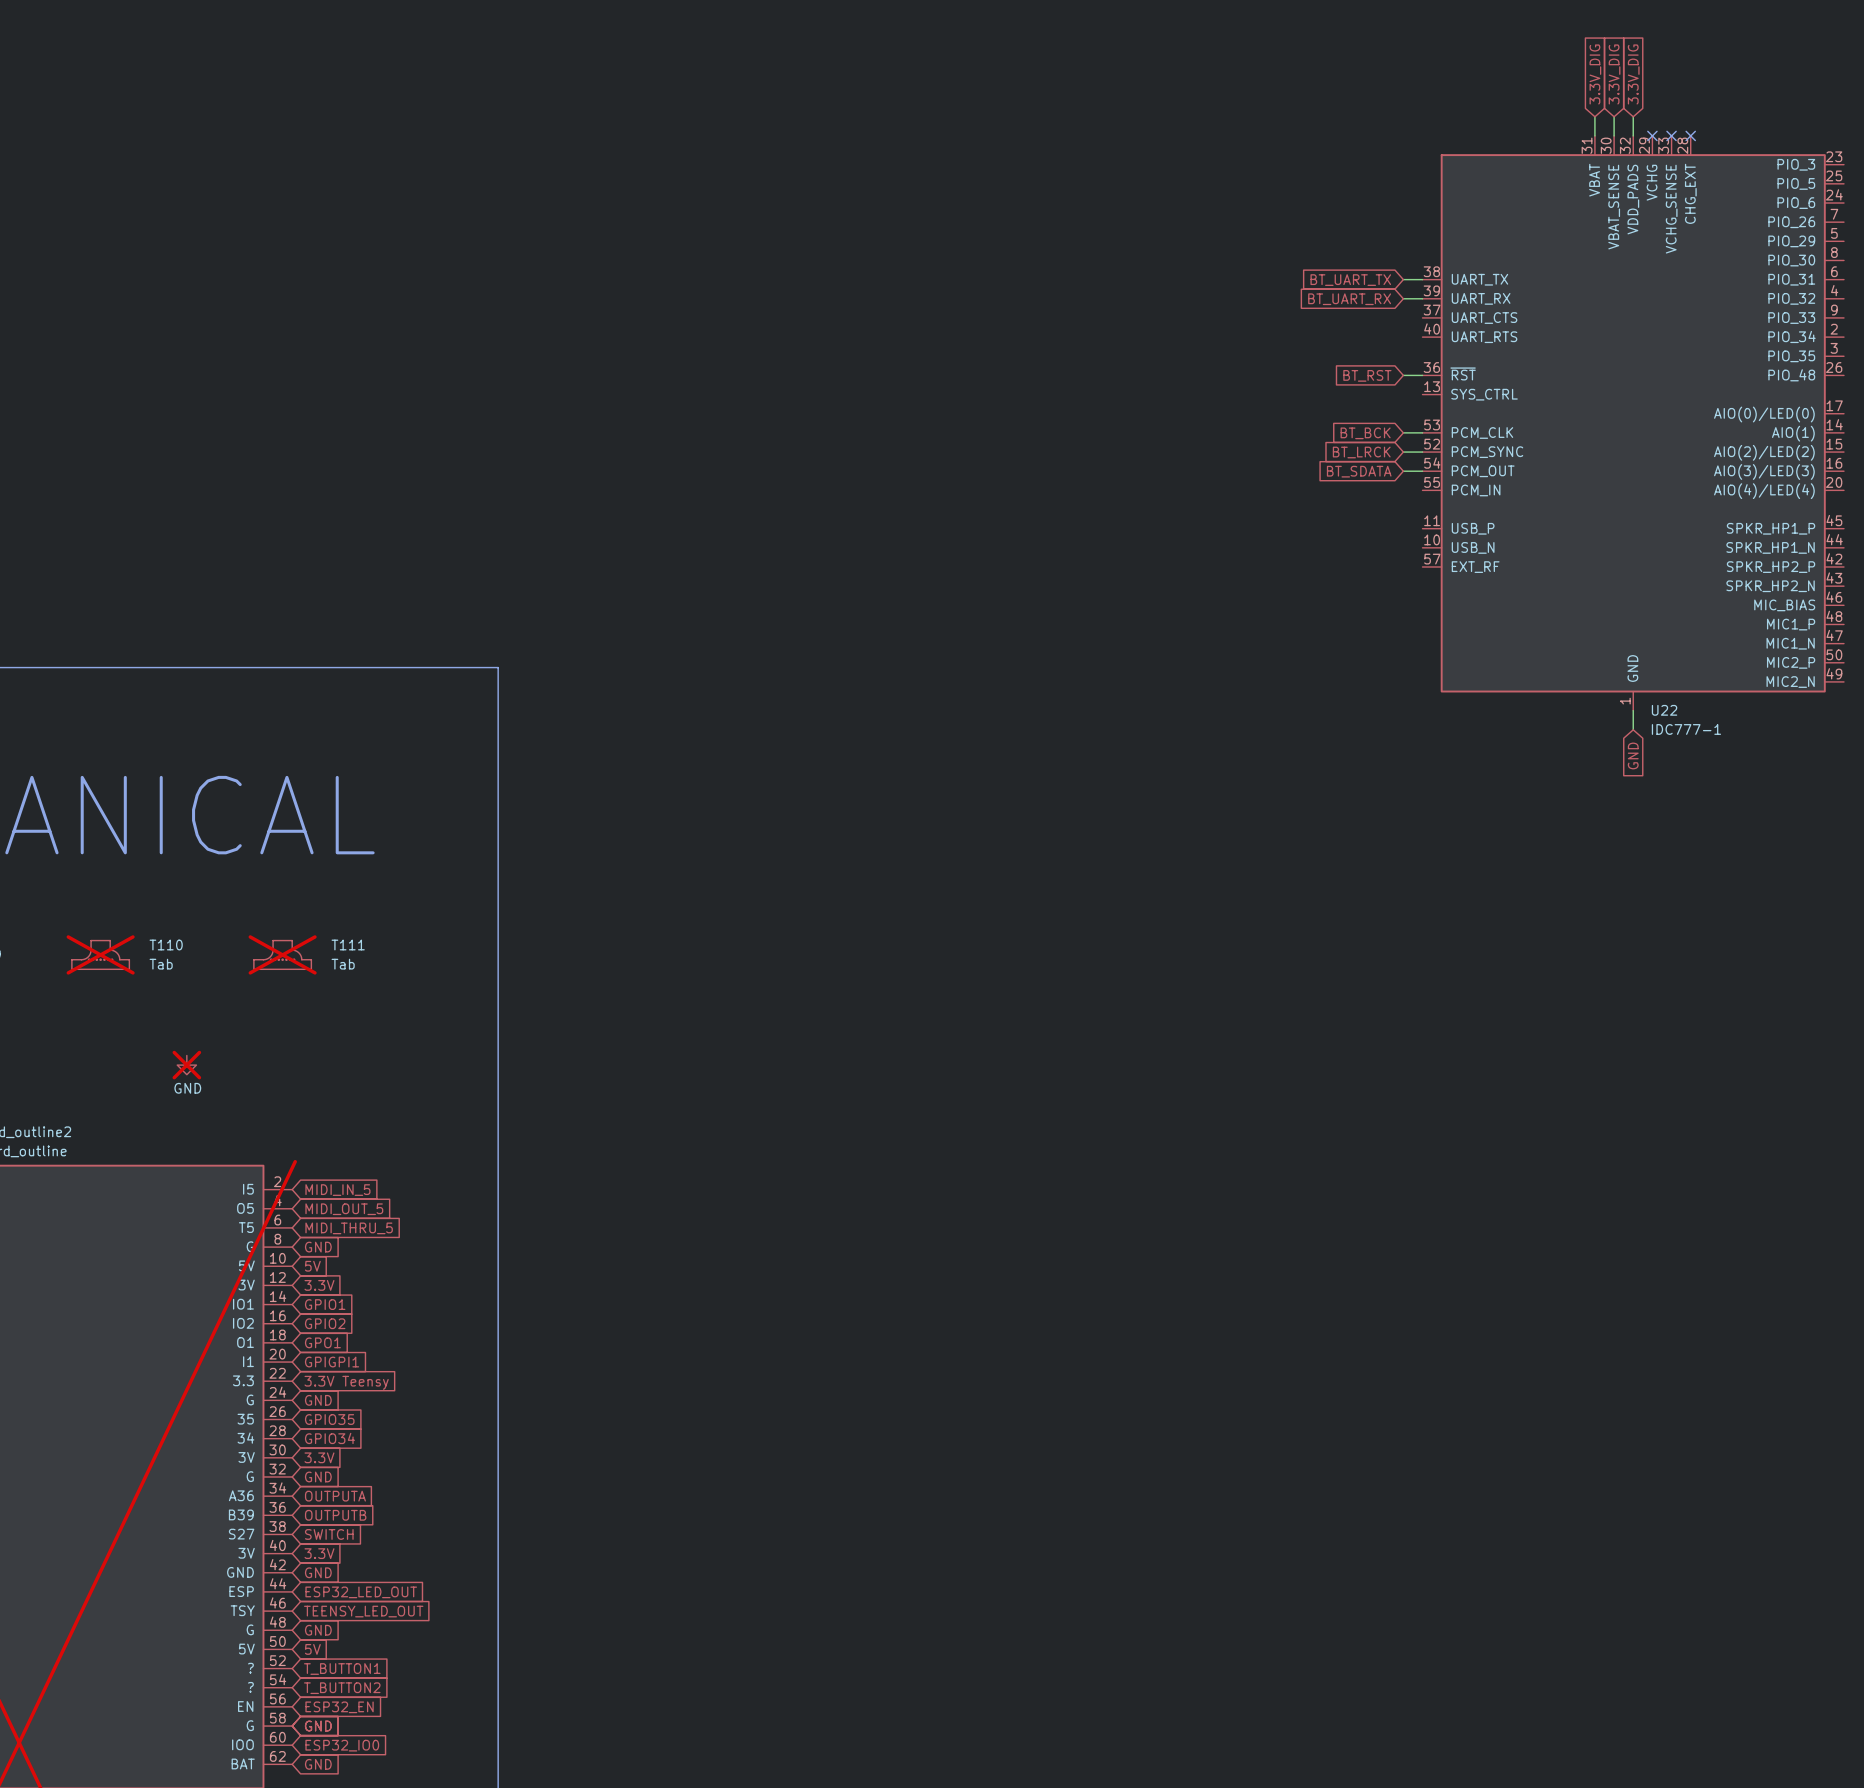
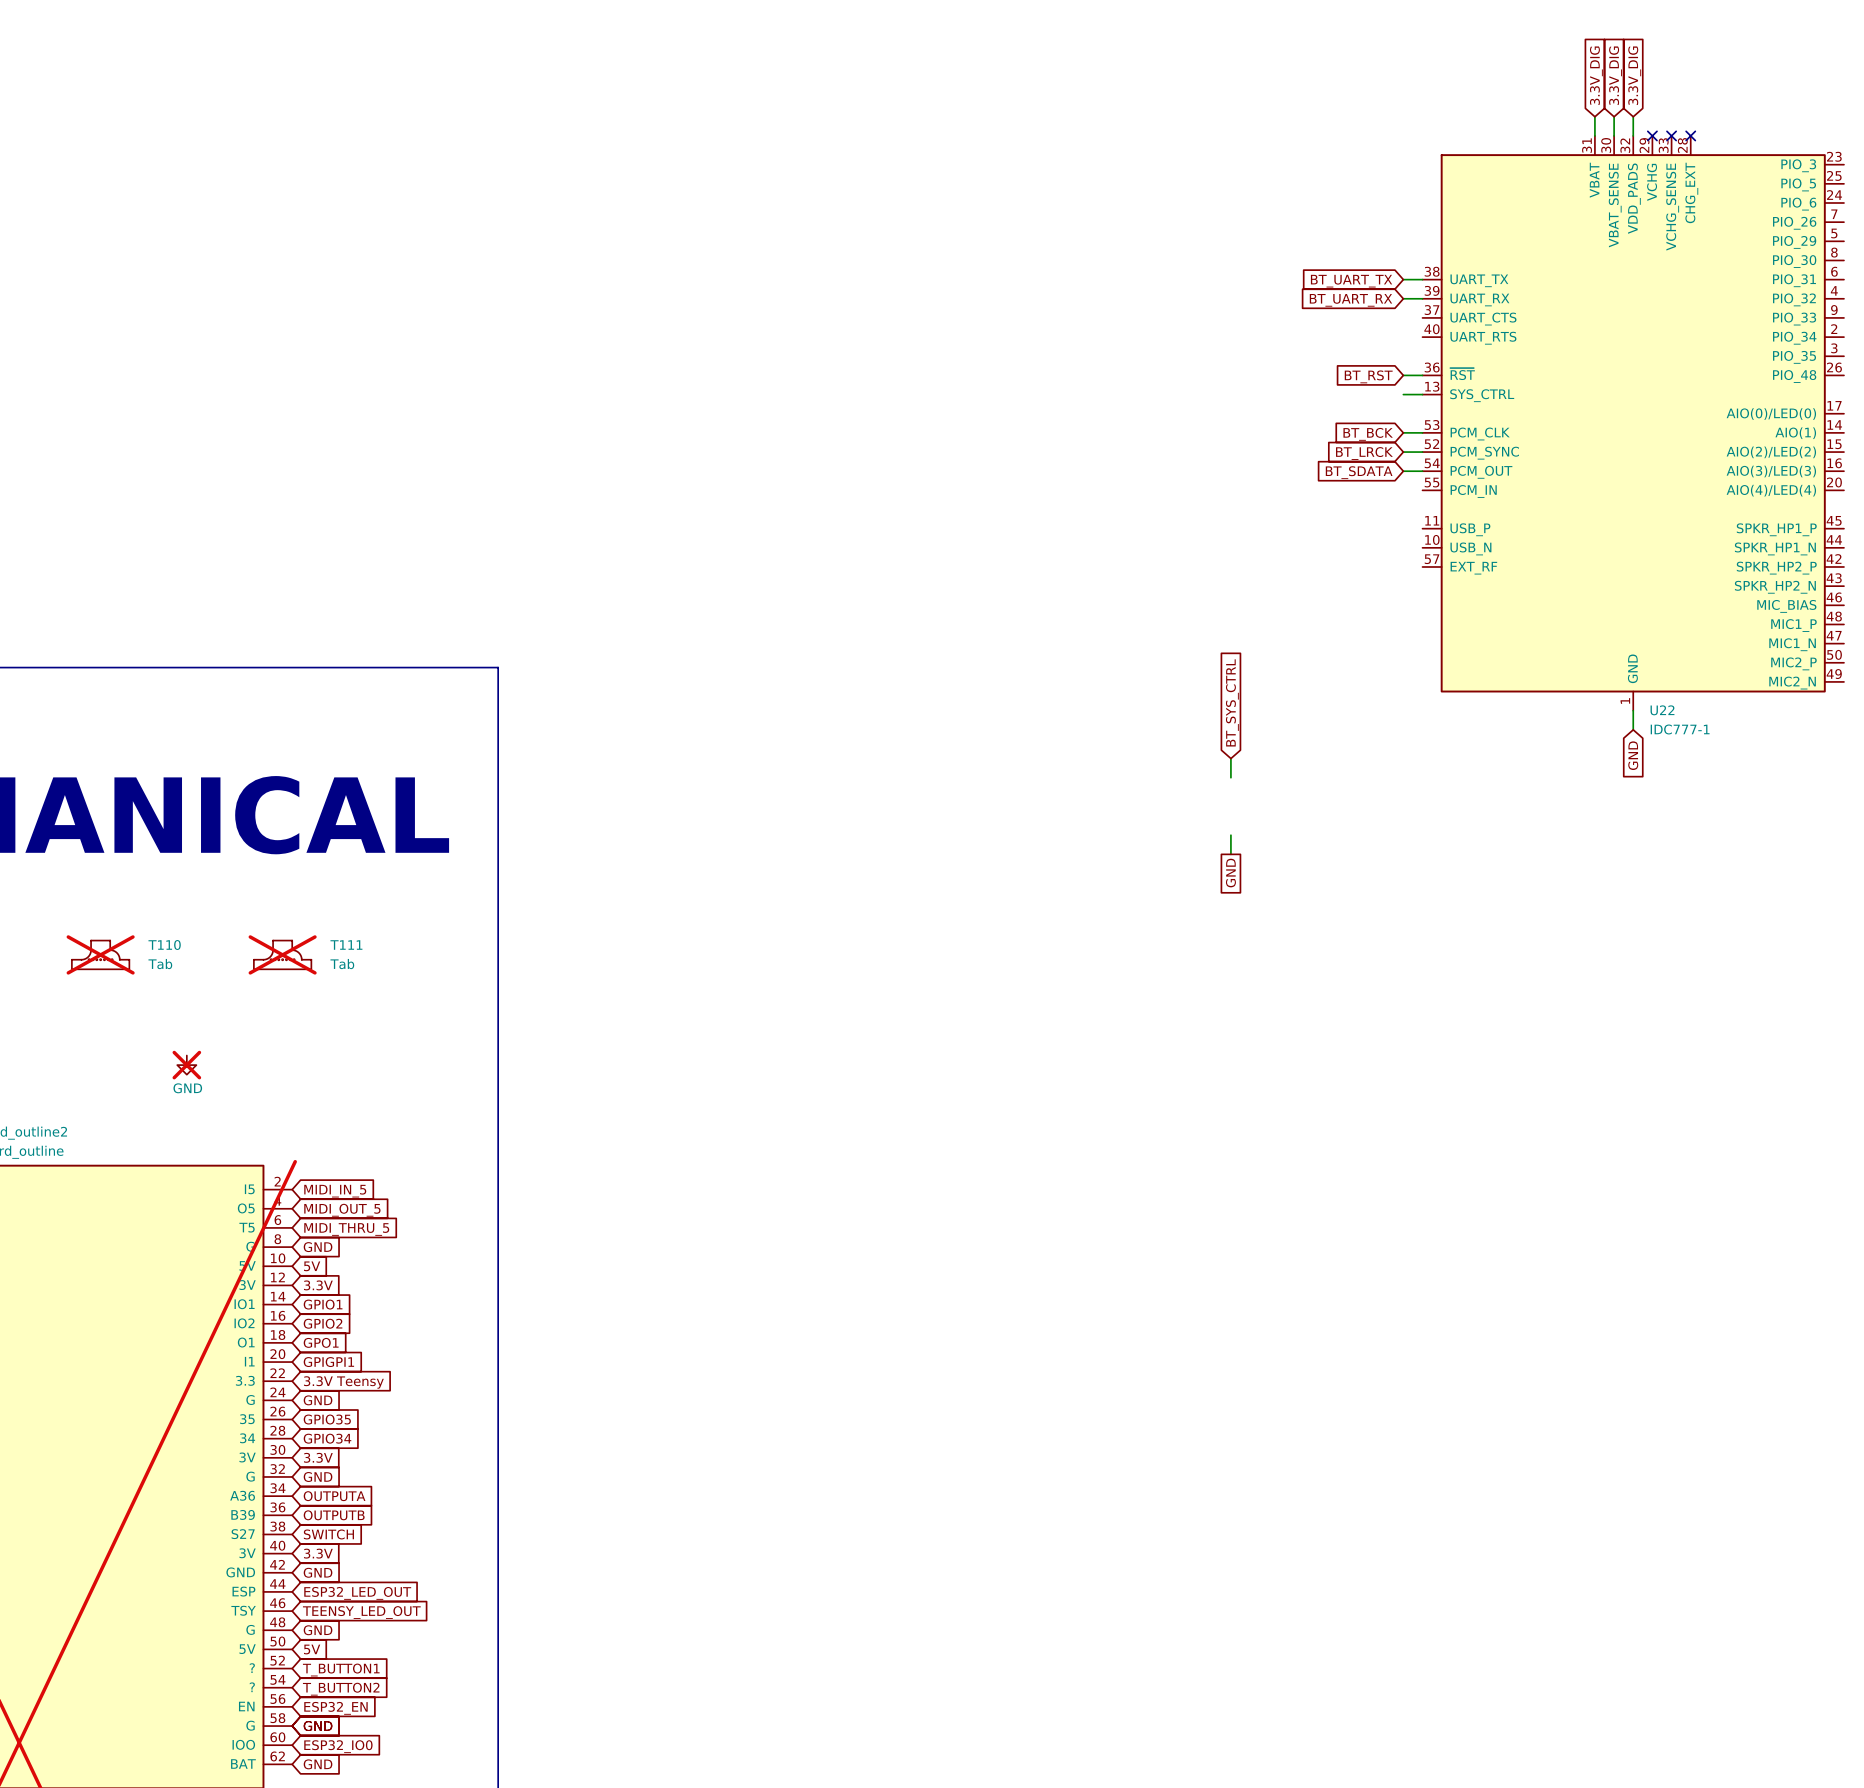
wire: none -> (1403, 394) (1422, 394)
global label: none -> BT_SYS_CTRL (1232, 702)
wire: none -> (1230, 758) (1230, 777)
wire: none -> (1230, 835) (1230, 854)
global label: none -> GND (1230, 873)

